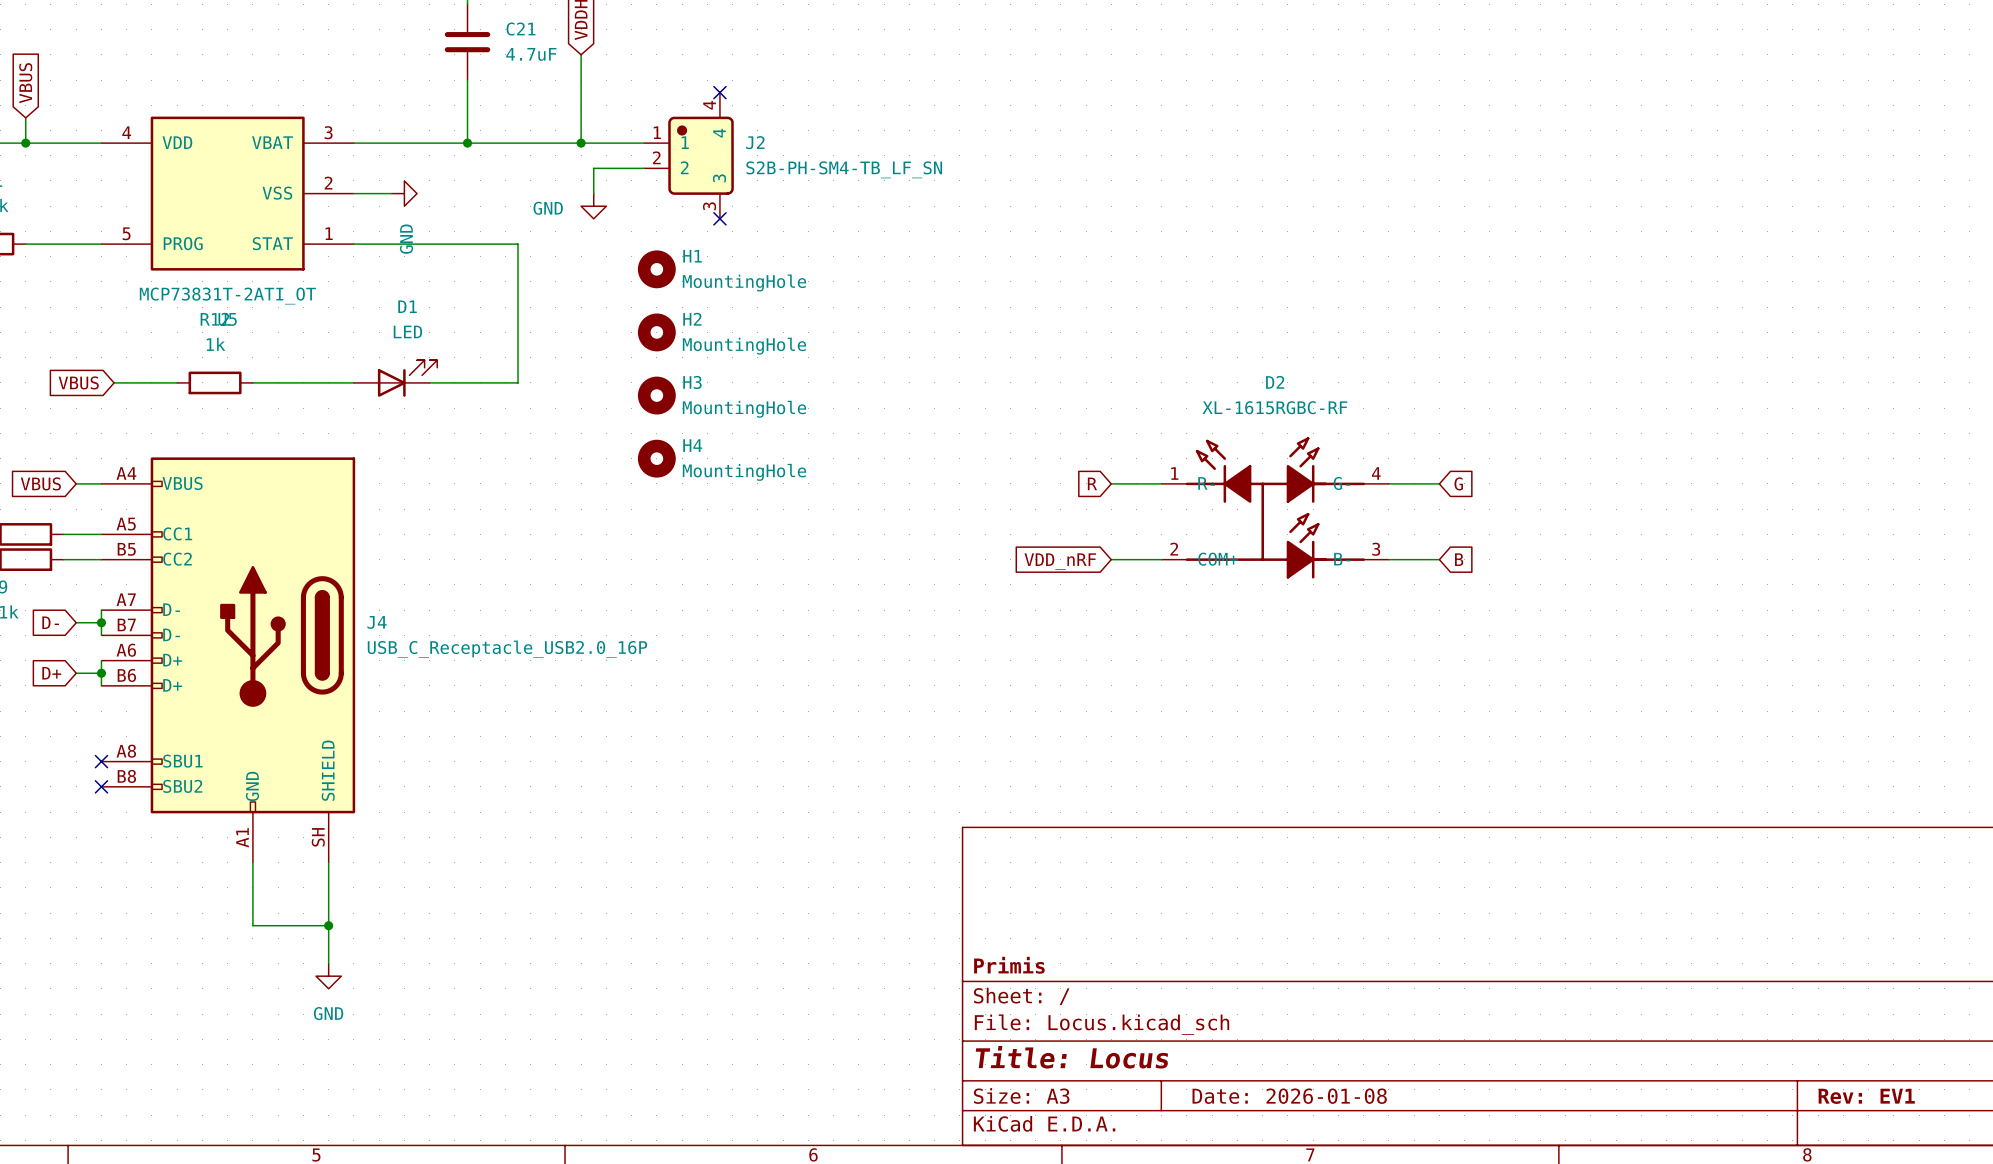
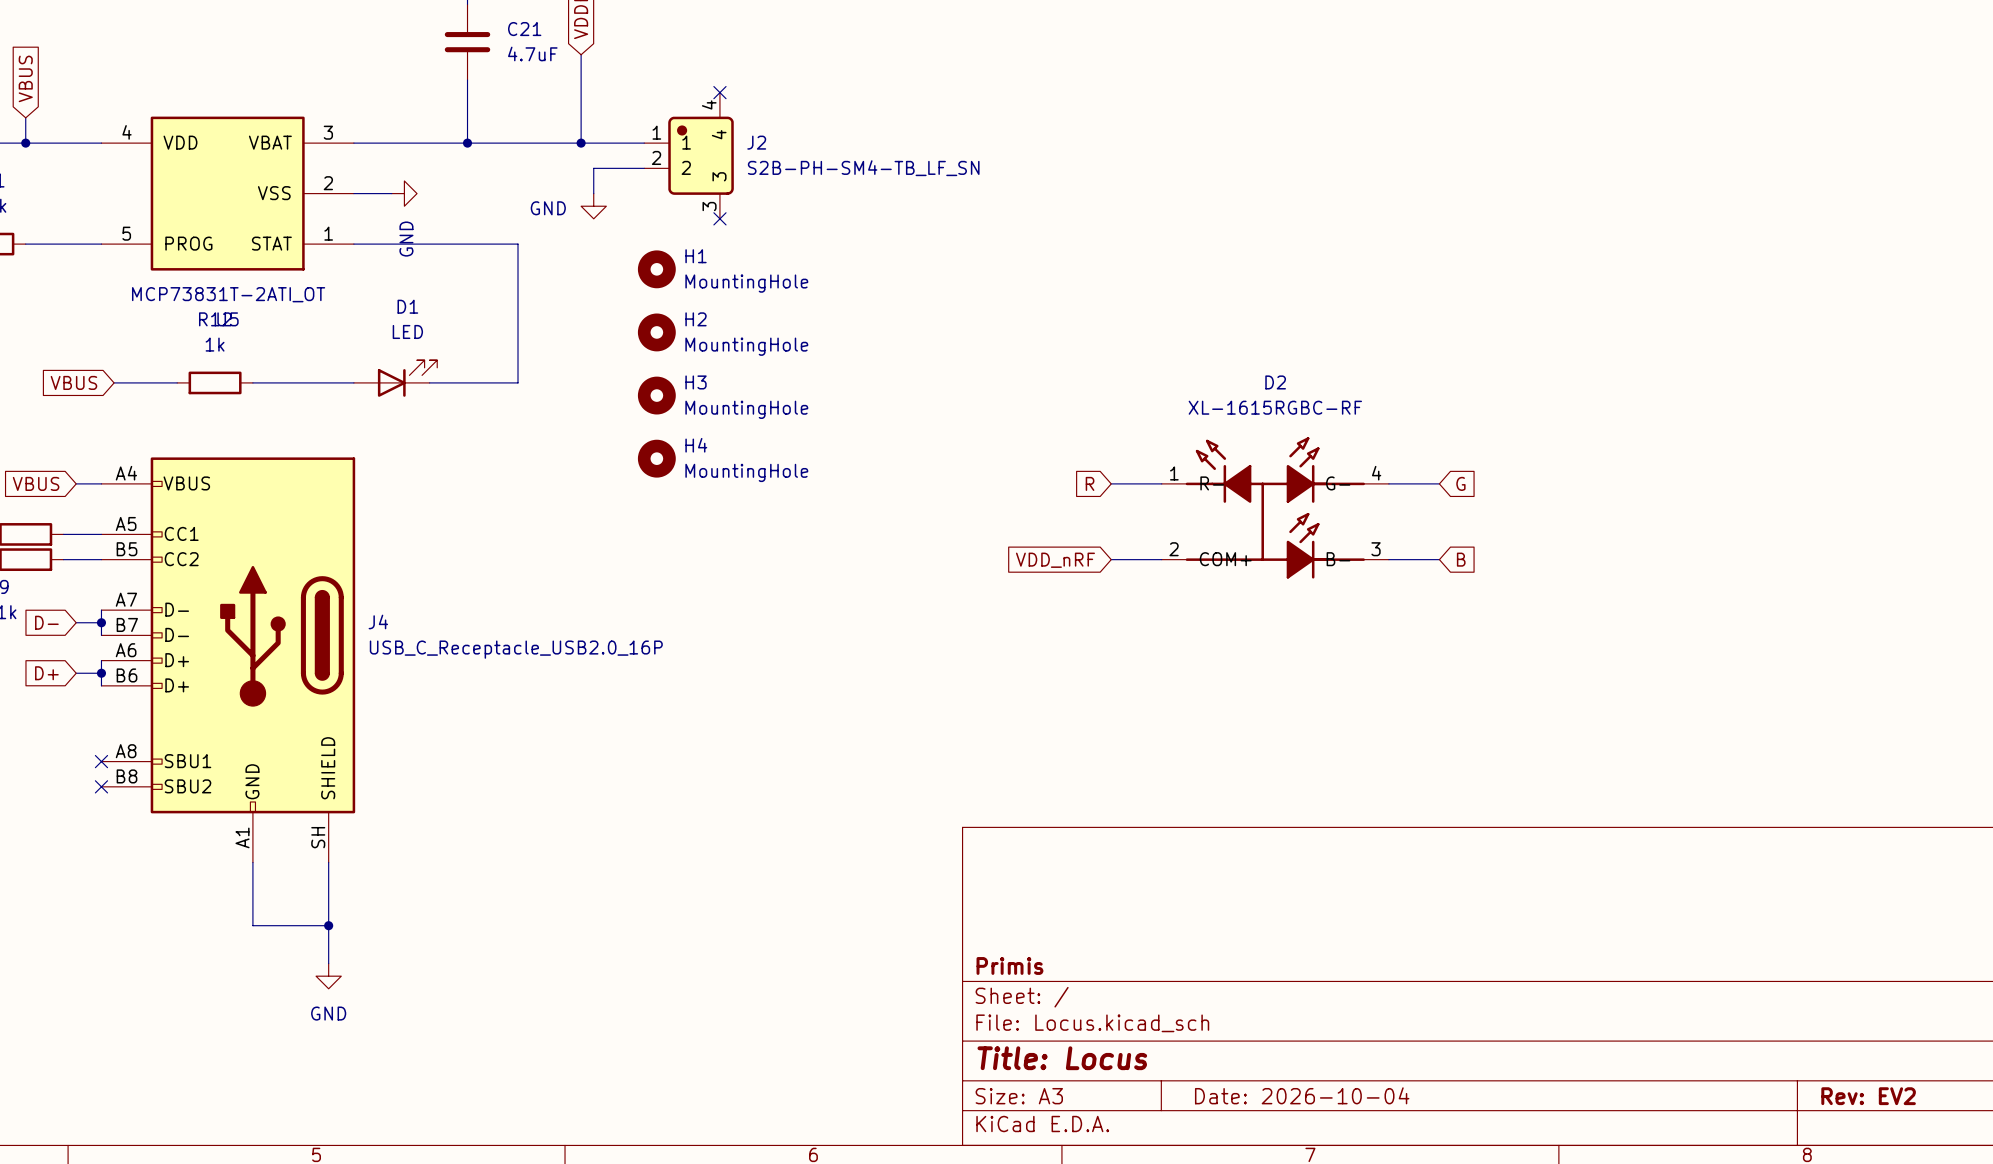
title block: Date: 2026-01-08 (1289, 1096) -> Date: 2026-10-04 (1302, 1095)
title block: Rev: EV1 (1866, 1096) -> Rev: EV2 (1868, 1096)

